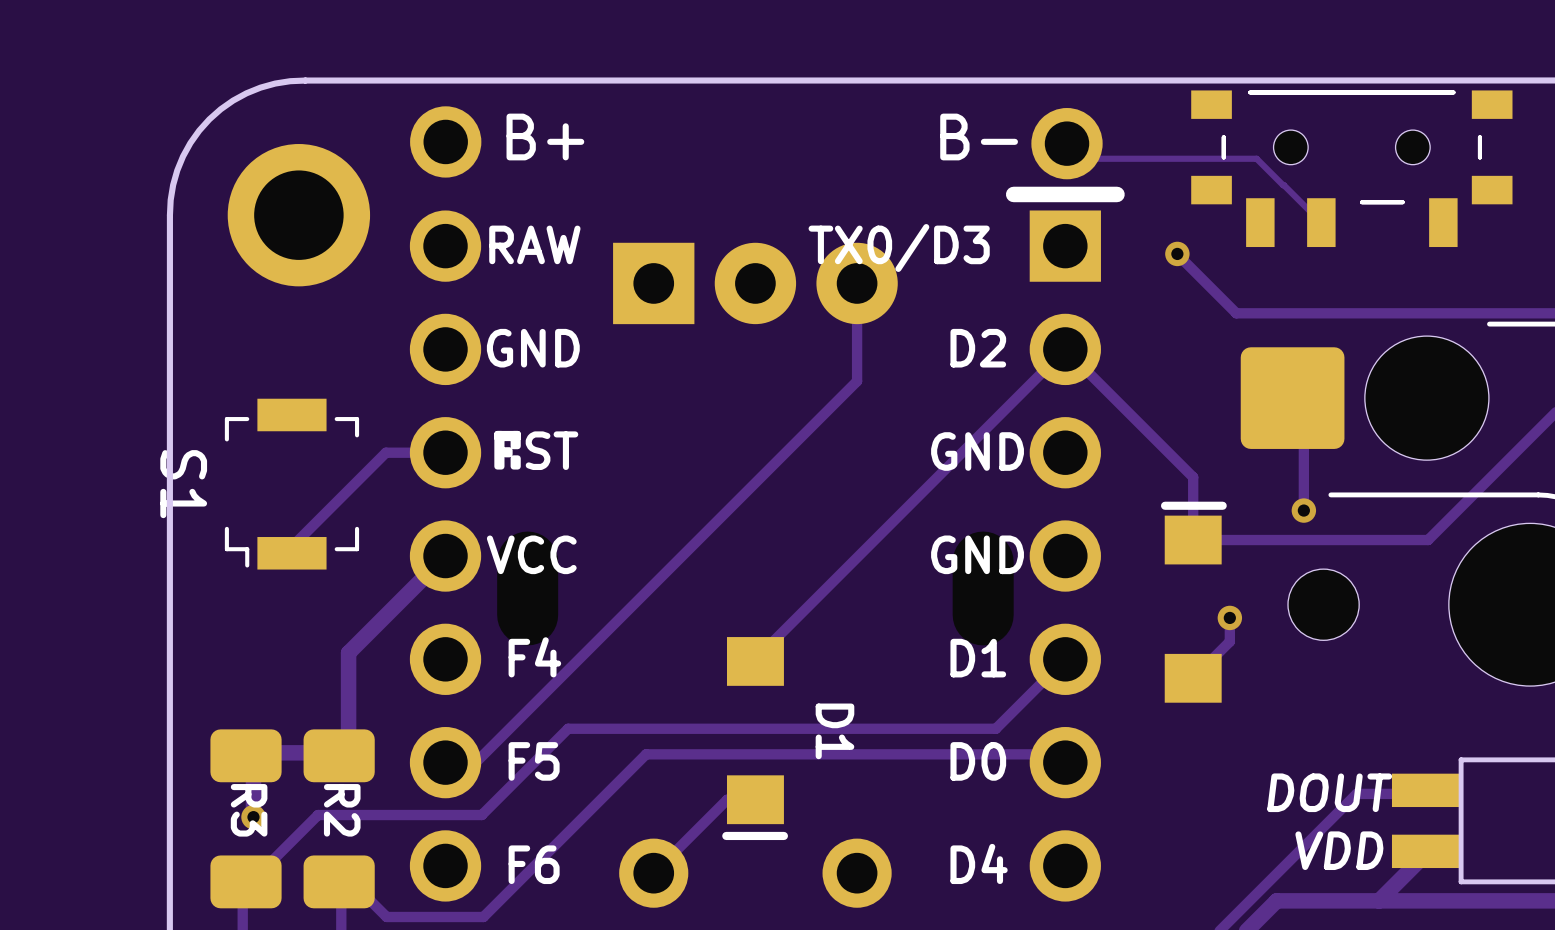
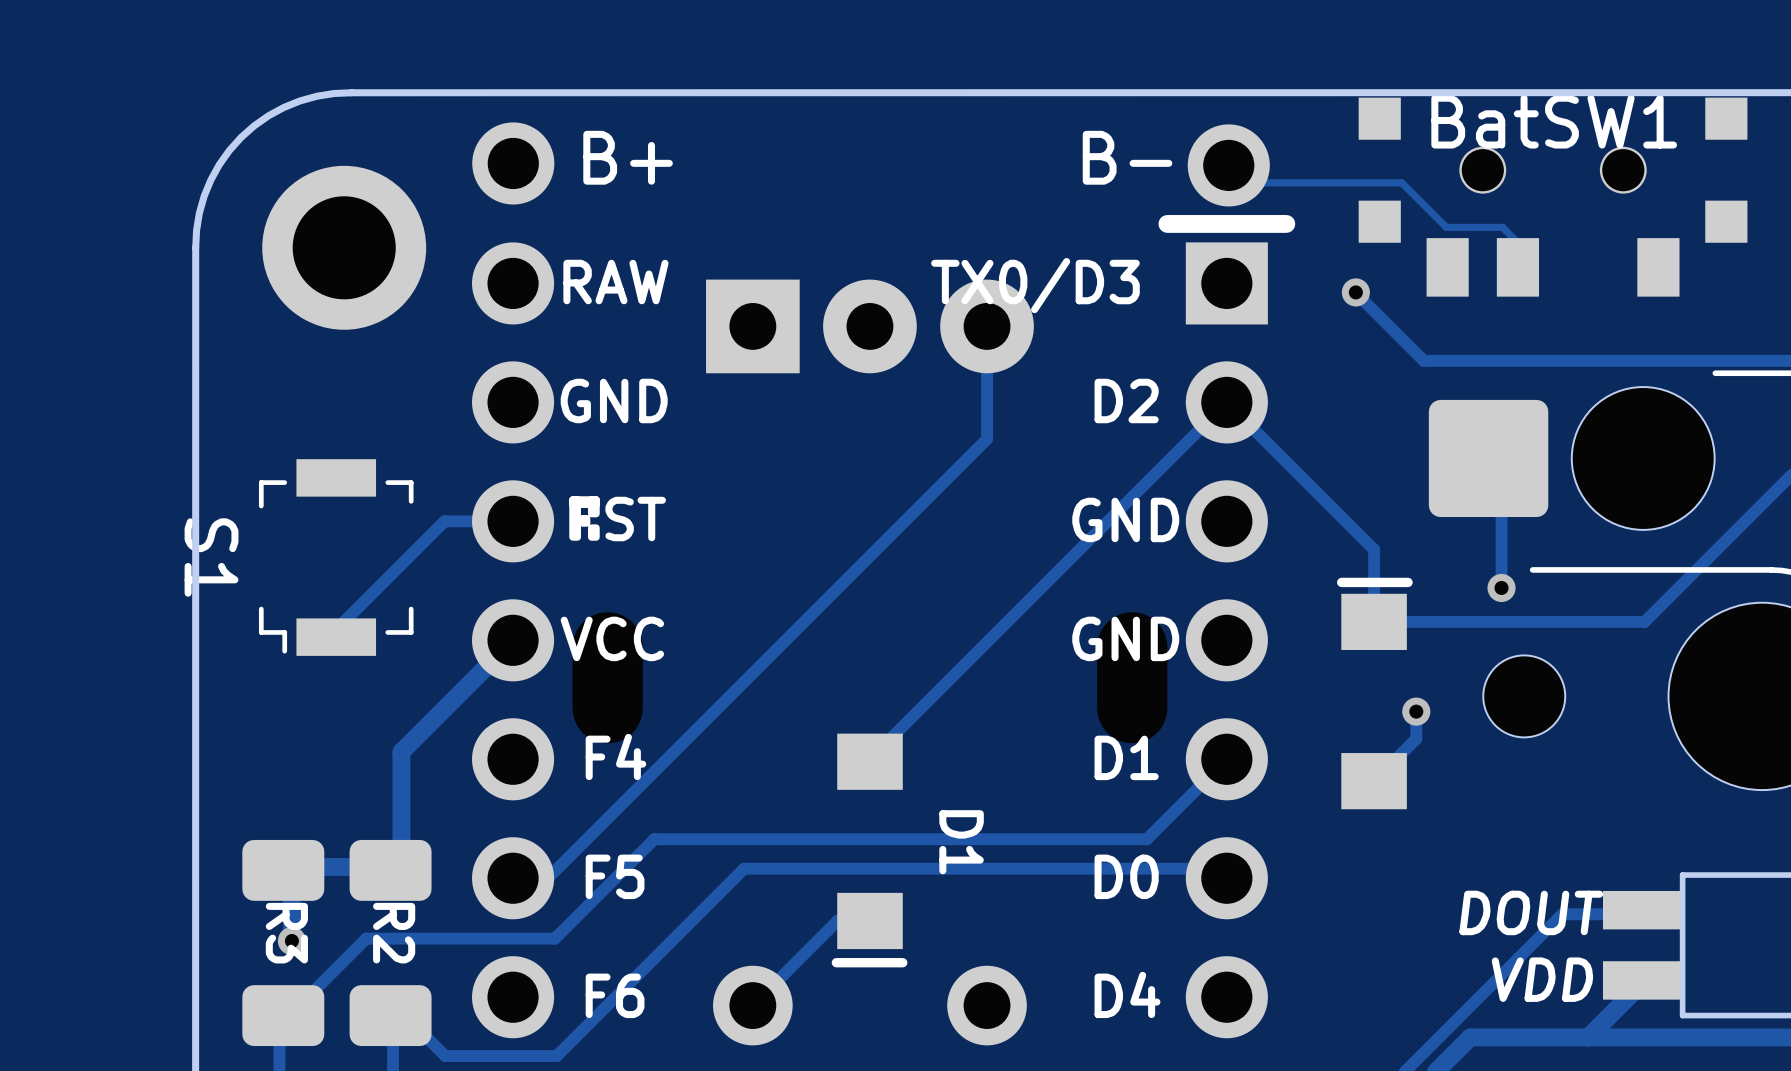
track: (1217, 158) (1256, 158) (1283, 185) -> (1401, 182) (1446, 227) (1502, 227) (1518, 243) (1518, 289)
part: (1351, 168) -> none
BatSW1: none -> (1553, 197)
track: (1283, 185) (1321, 222) -> none

